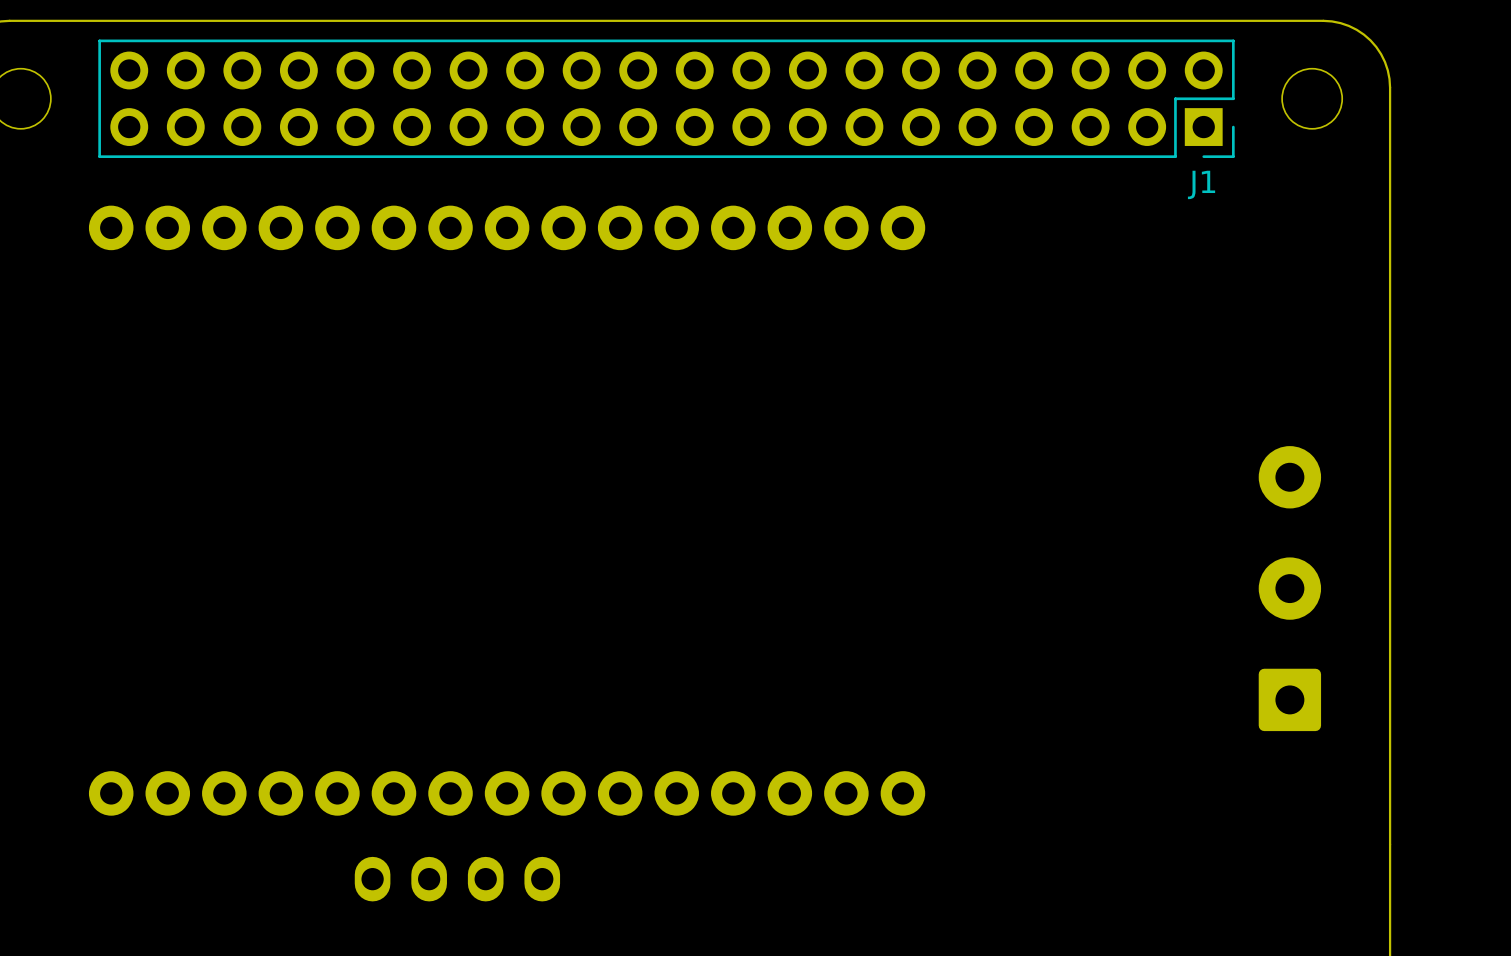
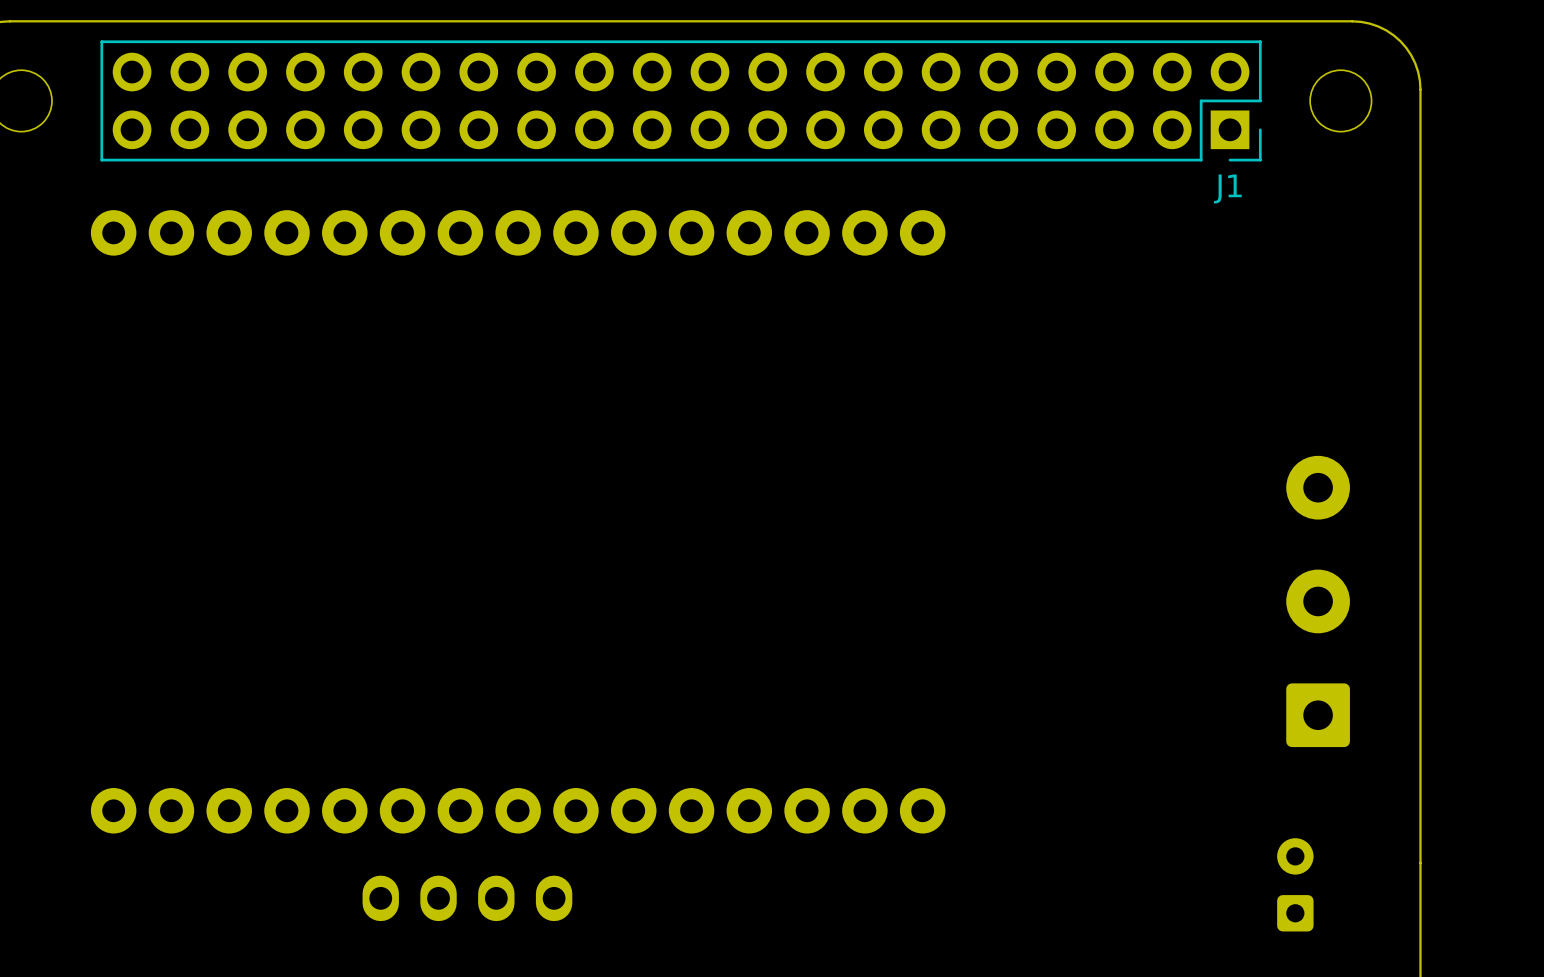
part: none -> (1295, 884)

